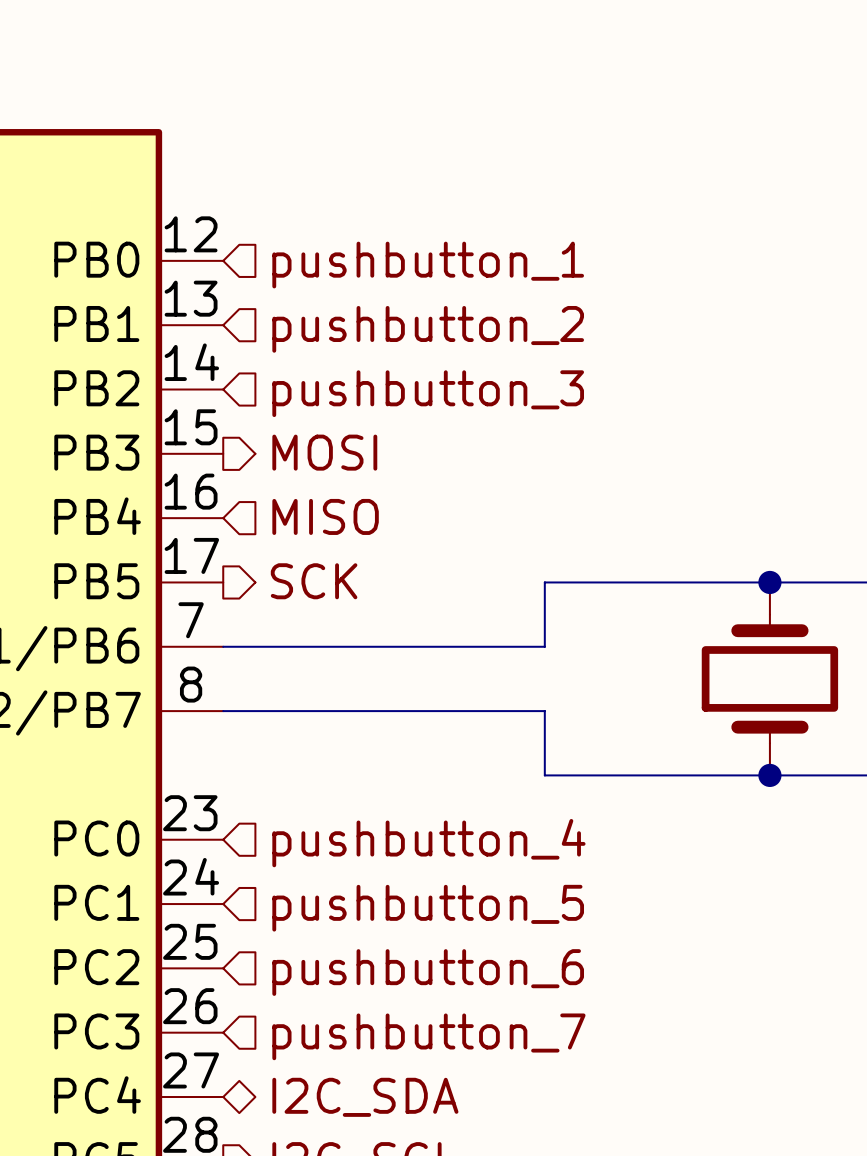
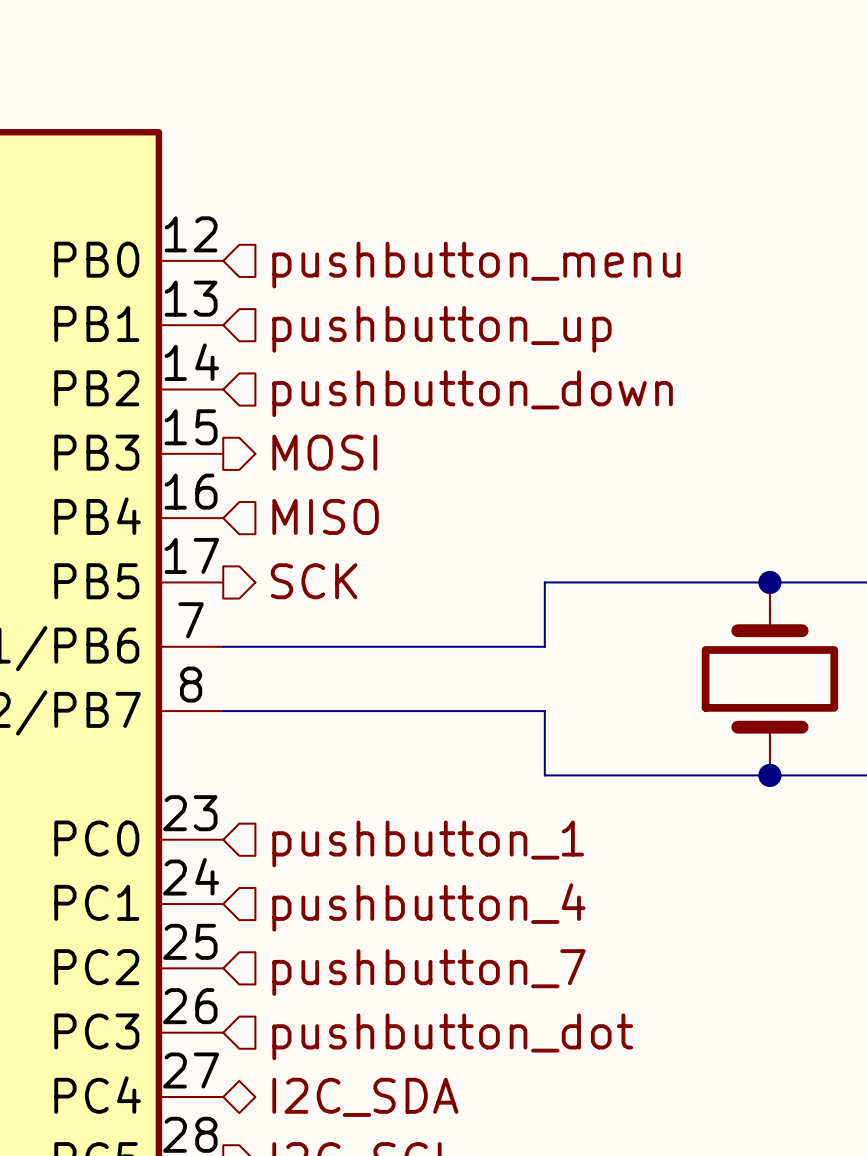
hierarchical label: pushbutton_1 (428, 265) -> pushbutton_menu (476, 265)
hierarchical label: pushbutton_2 (428, 329) -> pushbutton_up (441, 329)
hierarchical label: pushbutton_3 (428, 393) -> pushbutton_down (472, 393)
hierarchical label: pushbutton_4 (428, 843) -> pushbutton_1 (428, 843)
hierarchical label: pushbutton_5 (428, 908) -> pushbutton_4 (428, 907)
hierarchical label: pushbutton_6 (428, 972) -> pushbutton_7 (428, 972)
hierarchical label: pushbutton_7 (428, 1036) -> pushbutton_dot (452, 1036)

